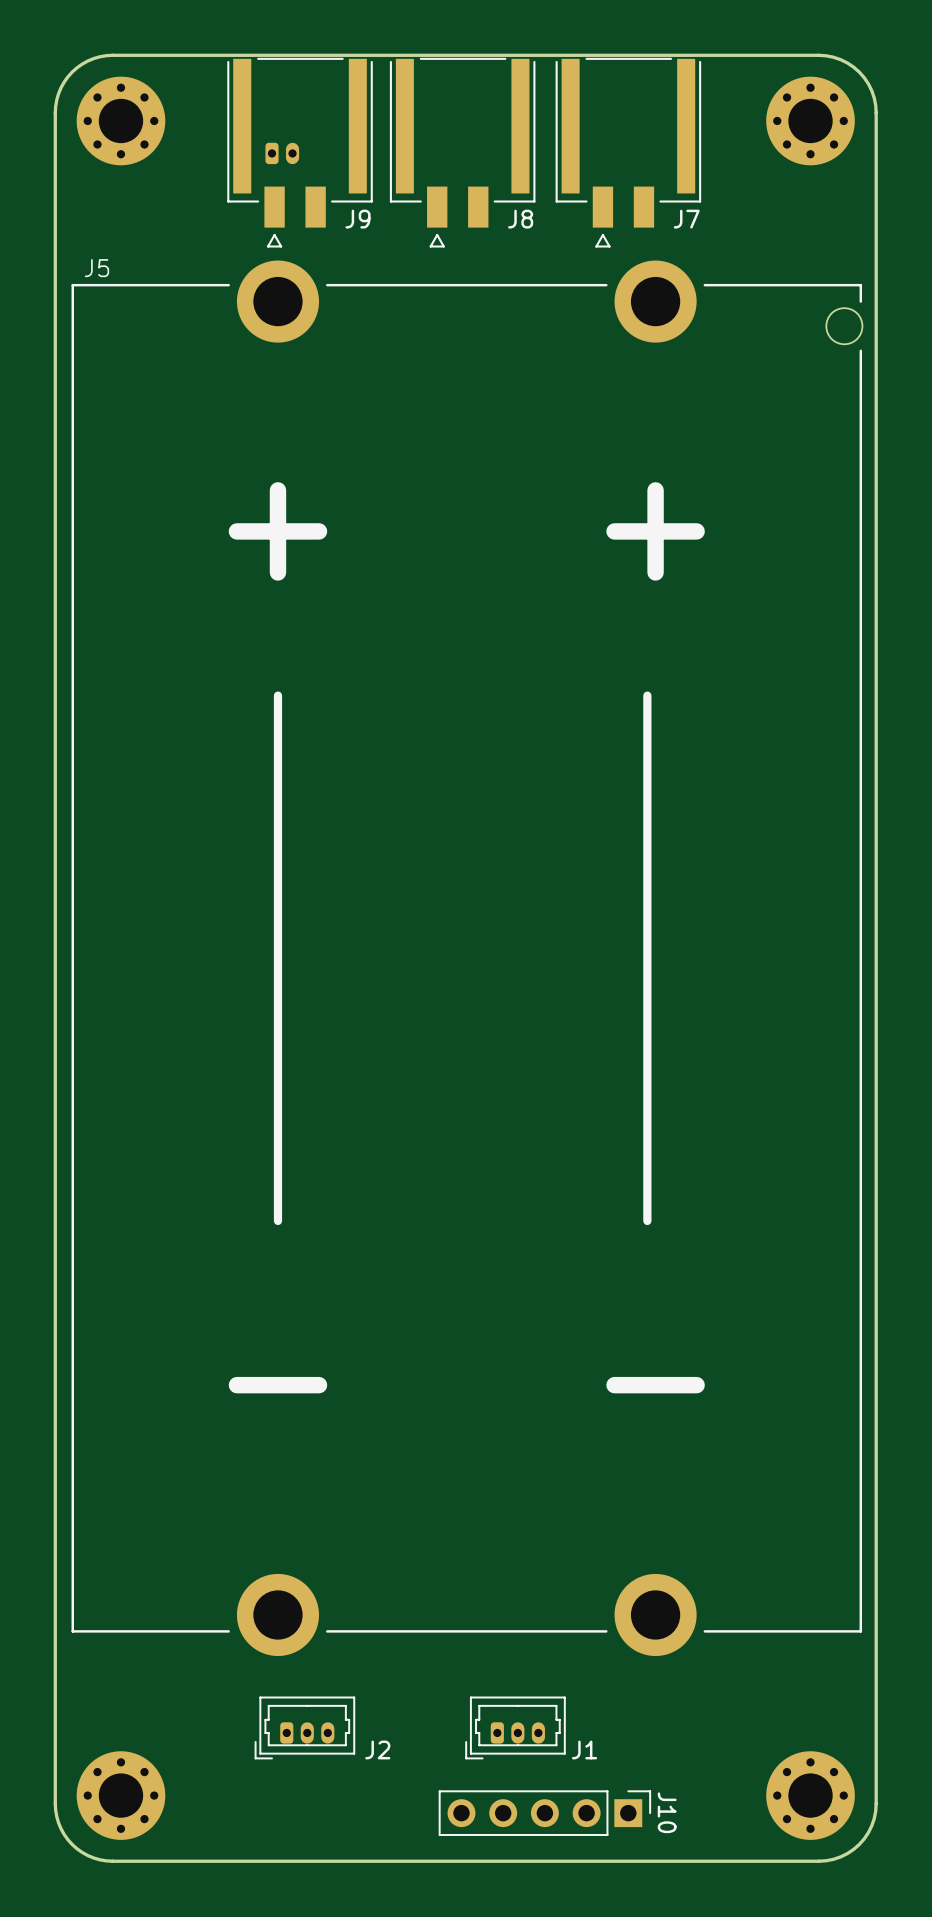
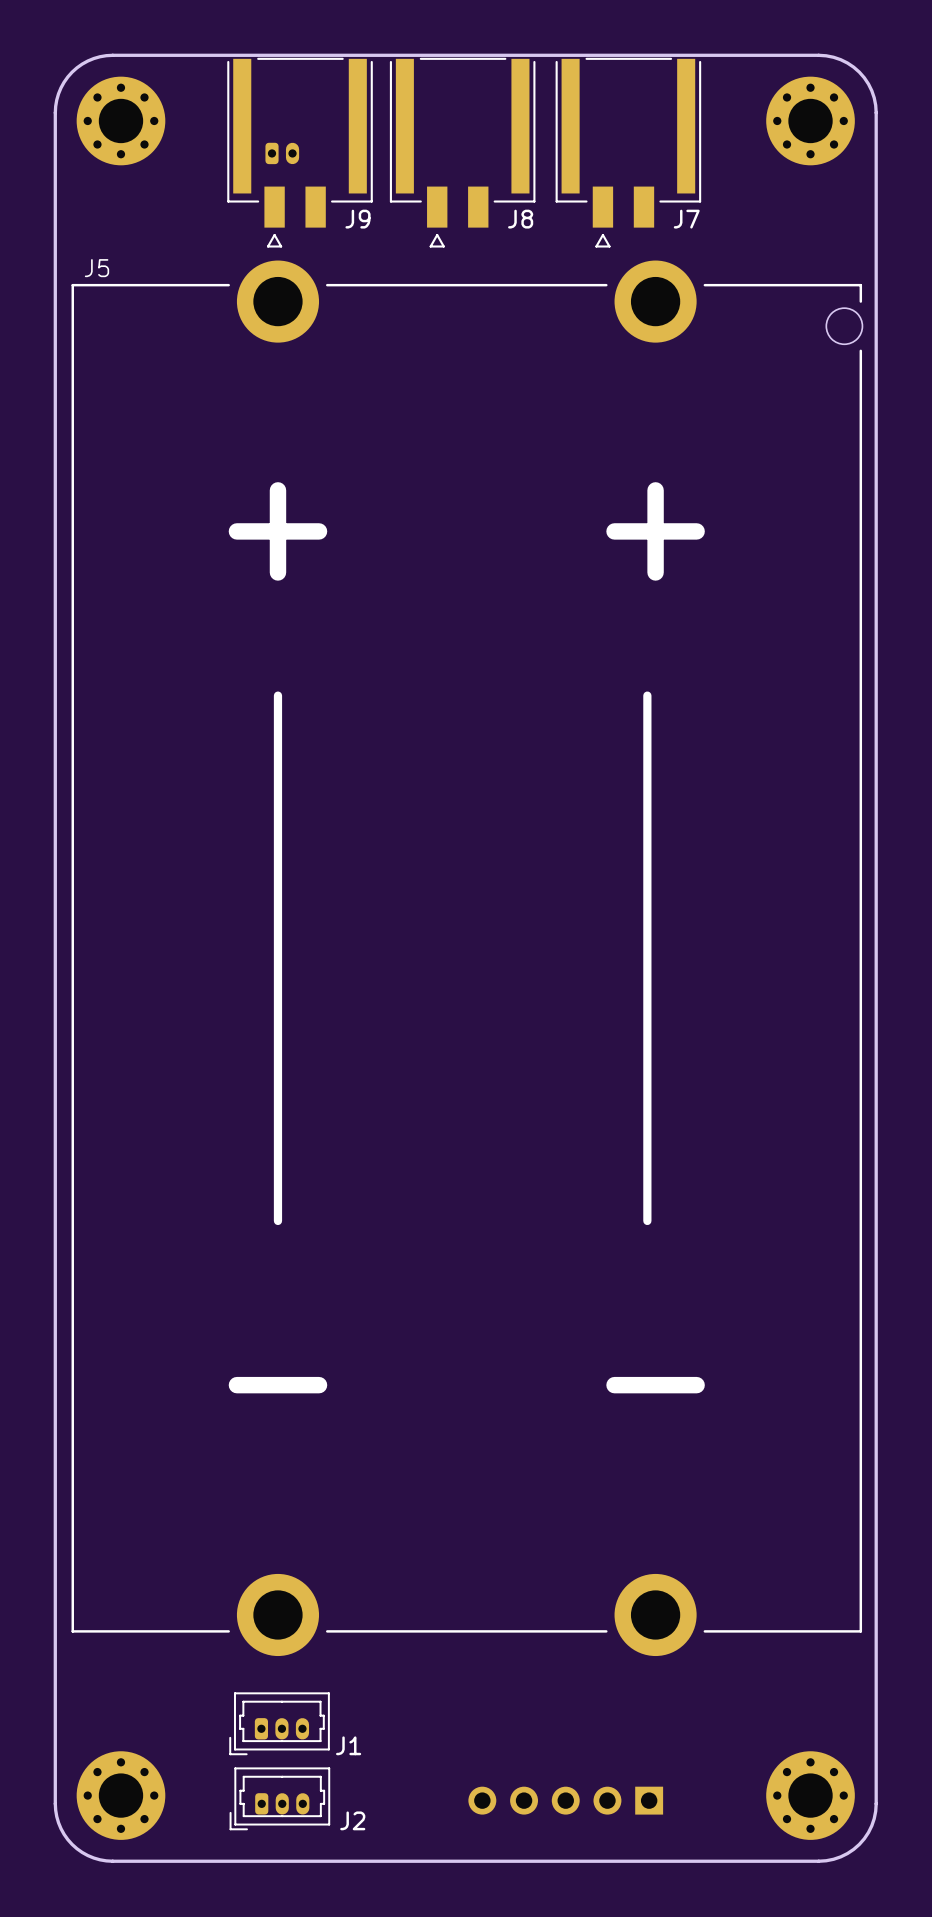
J2 position: (304, 1727) -> (279, 1798)
J1 position: (515, 1727) -> (279, 1723)
J10 side: bottom (544, 1813) -> top (565, 1800)

